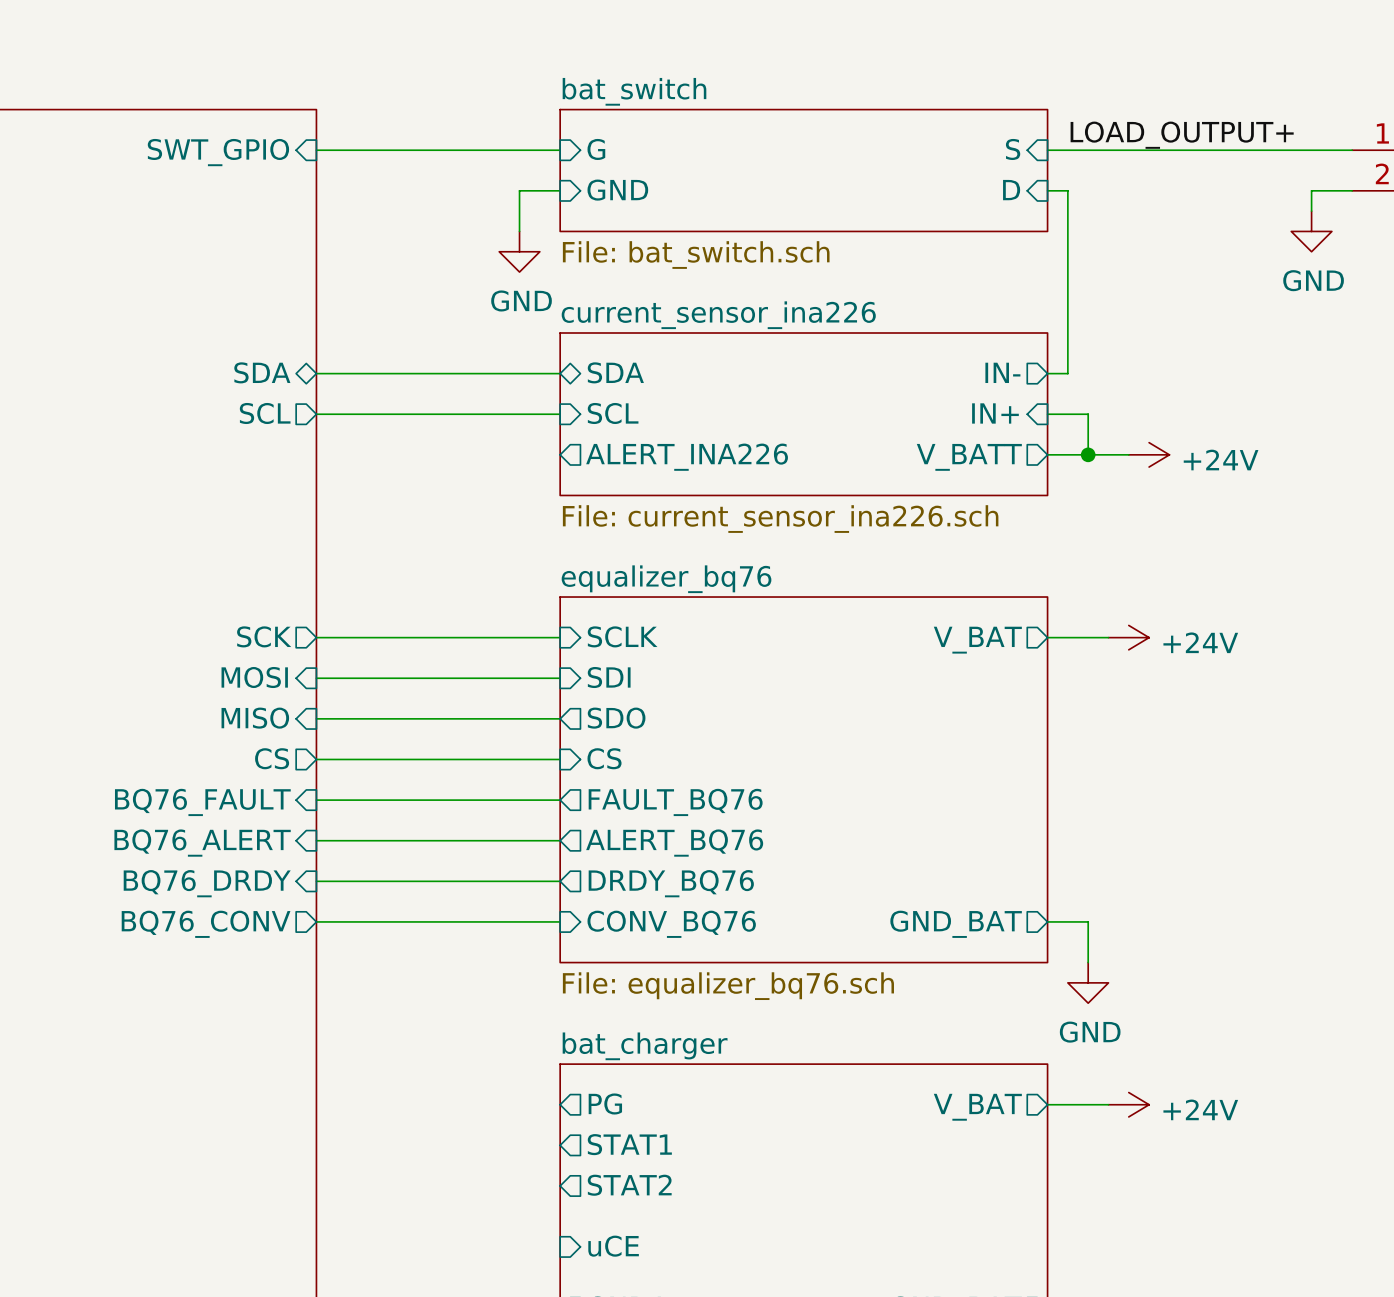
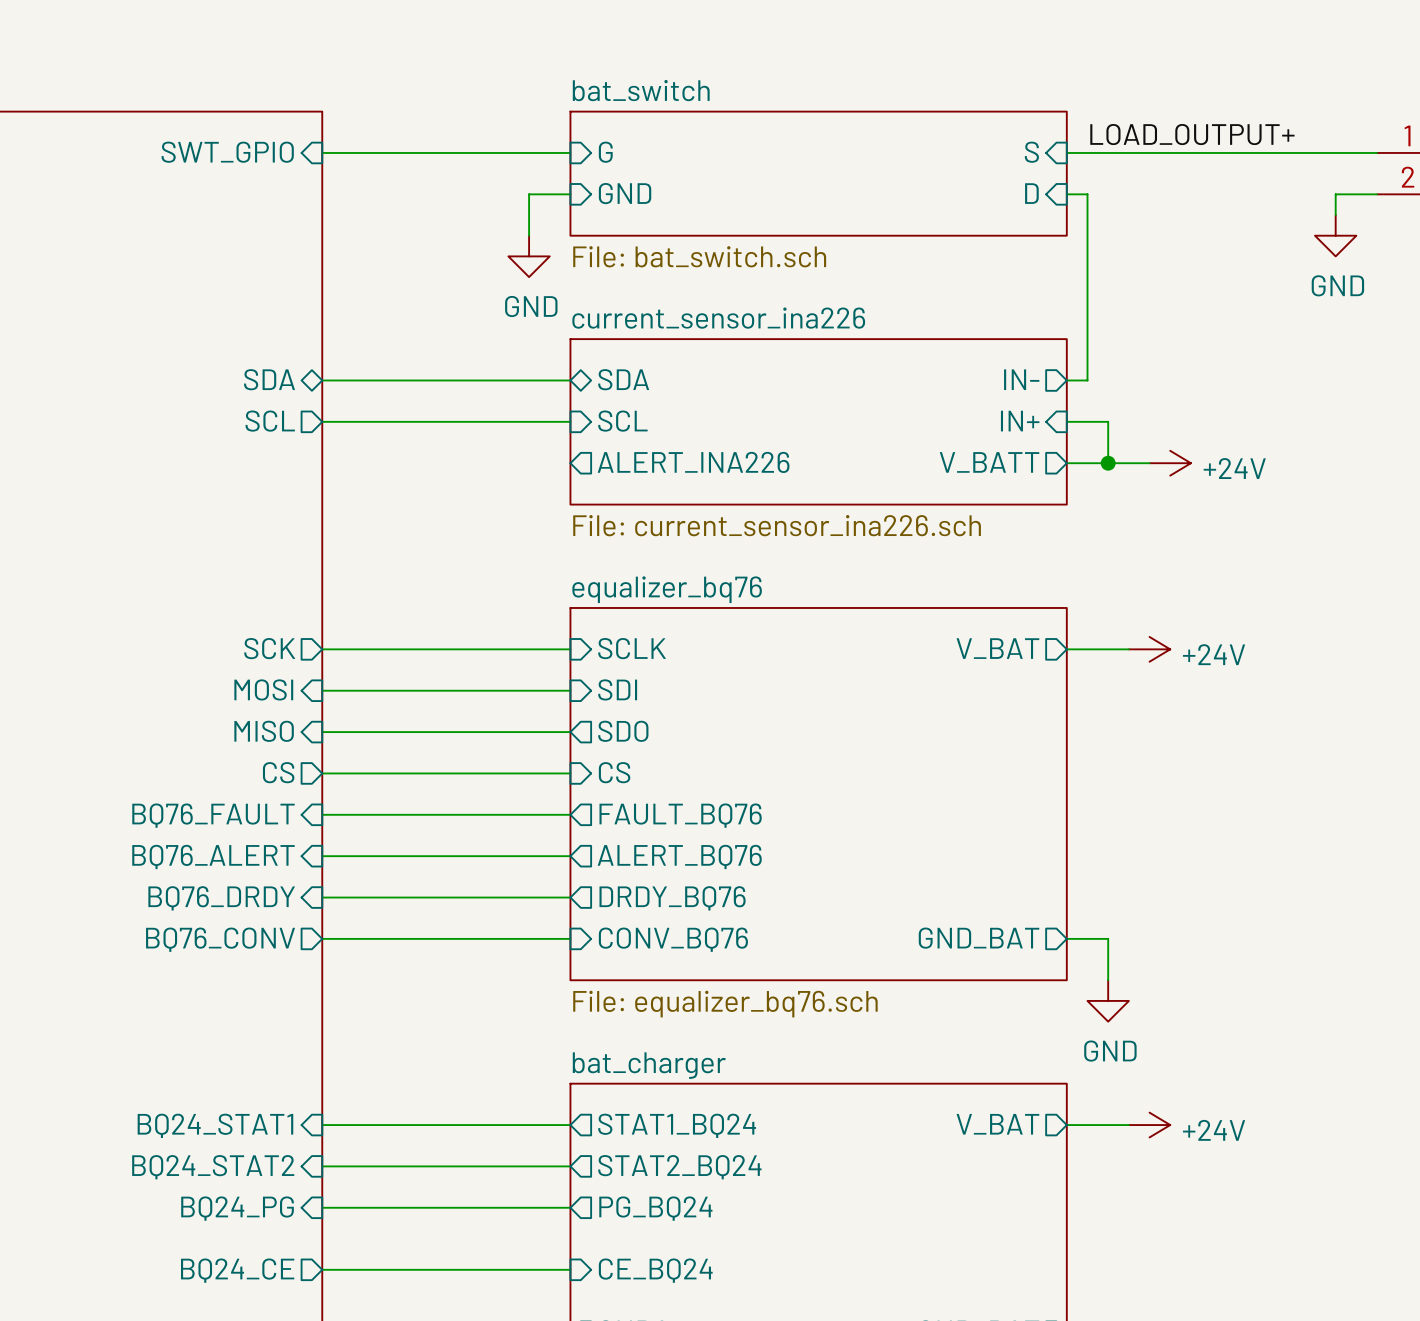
sheet pin: PG (605, 1103) -> STAT1_BQ24 (677, 1125)
wire: none -> (322, 1125) (570, 1125)
sheet pin: none -> BQ24_STAT1 (215, 1125)
sheet pin: STAT1 (629, 1144) -> STAT2_BQ24 (679, 1167)
wire: none -> (322, 1166) (570, 1166)
sheet pin: none -> BQ24_STAT2 (213, 1167)
wire: none -> (322, 1207) (570, 1207)
sheet pin: STAT2 (629, 1185) -> PG_BQ24 (655, 1208)
sheet pin: none -> BQ24_PG (237, 1208)
wire: none -> (322, 1269) (570, 1269)
sheet pin: uCE (613, 1246) -> CE_BQ24 (655, 1270)
sheet pin: none -> BQ24_CE (237, 1270)

